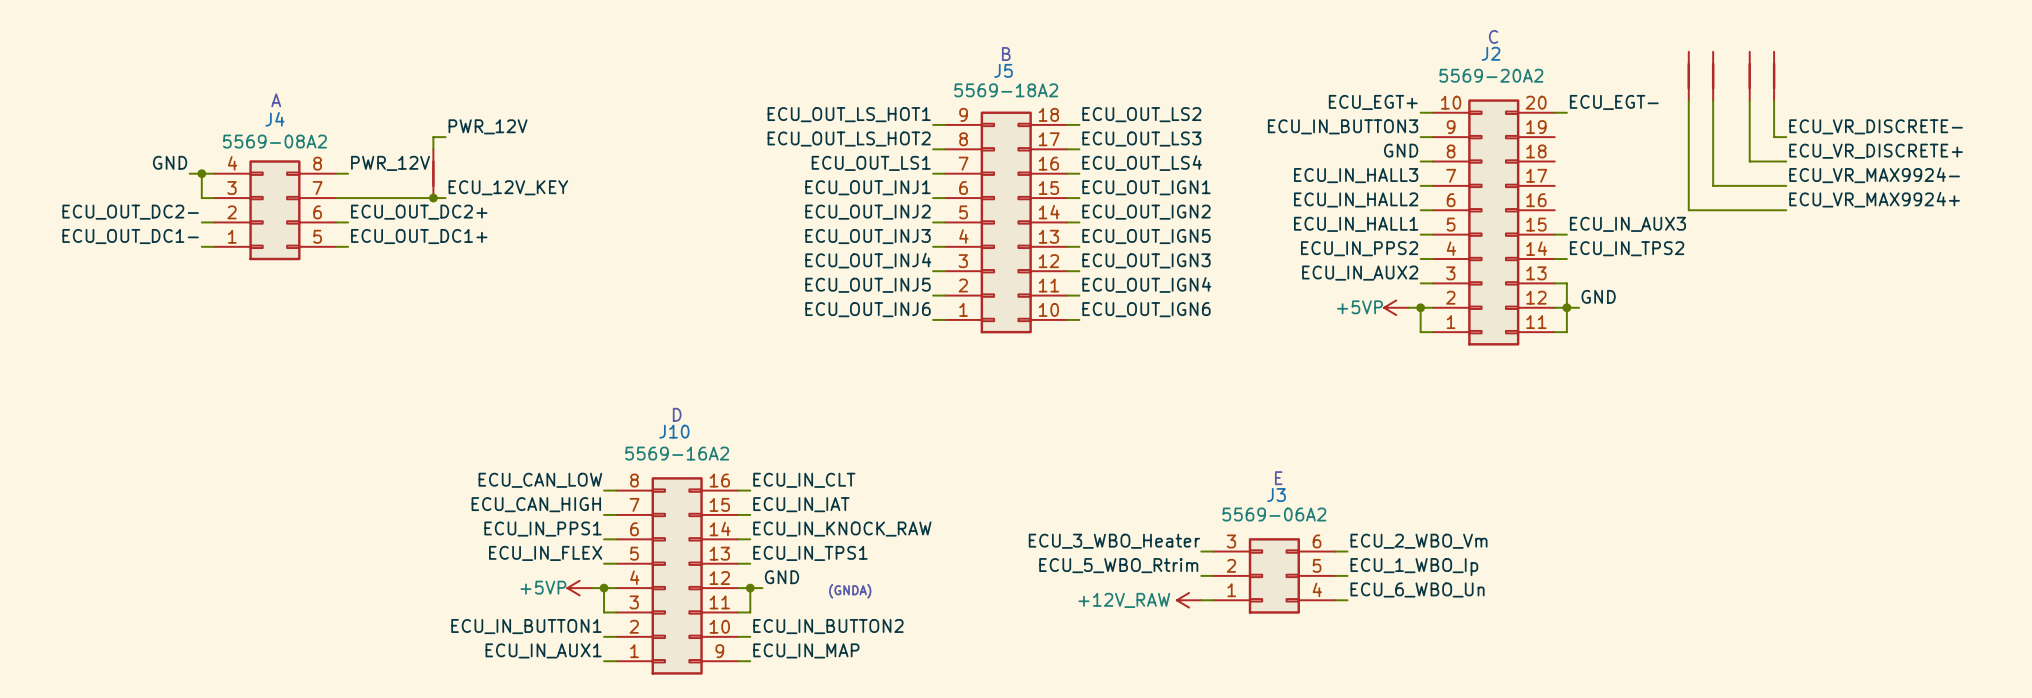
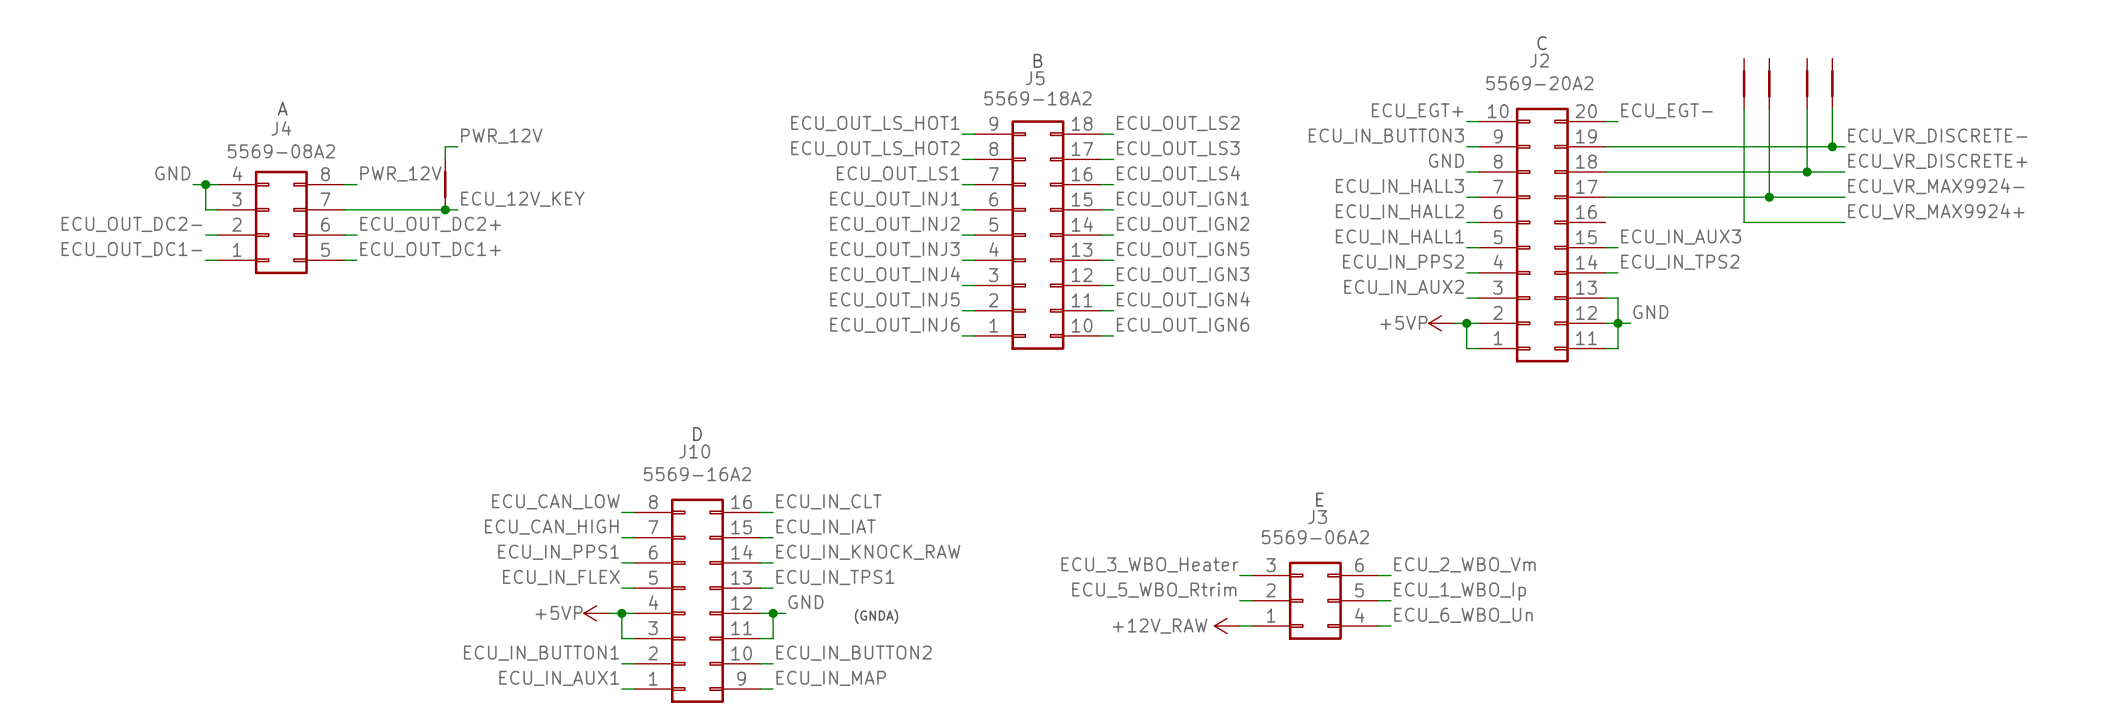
wire: none -> (1605, 146) (1832, 146)
junction: none -> (1832, 146)
wire: none -> (1605, 172) (1807, 172)
junction: none -> (1807, 172)
wire: none -> (1605, 197) (1769, 197)
junction: none -> (1769, 197)

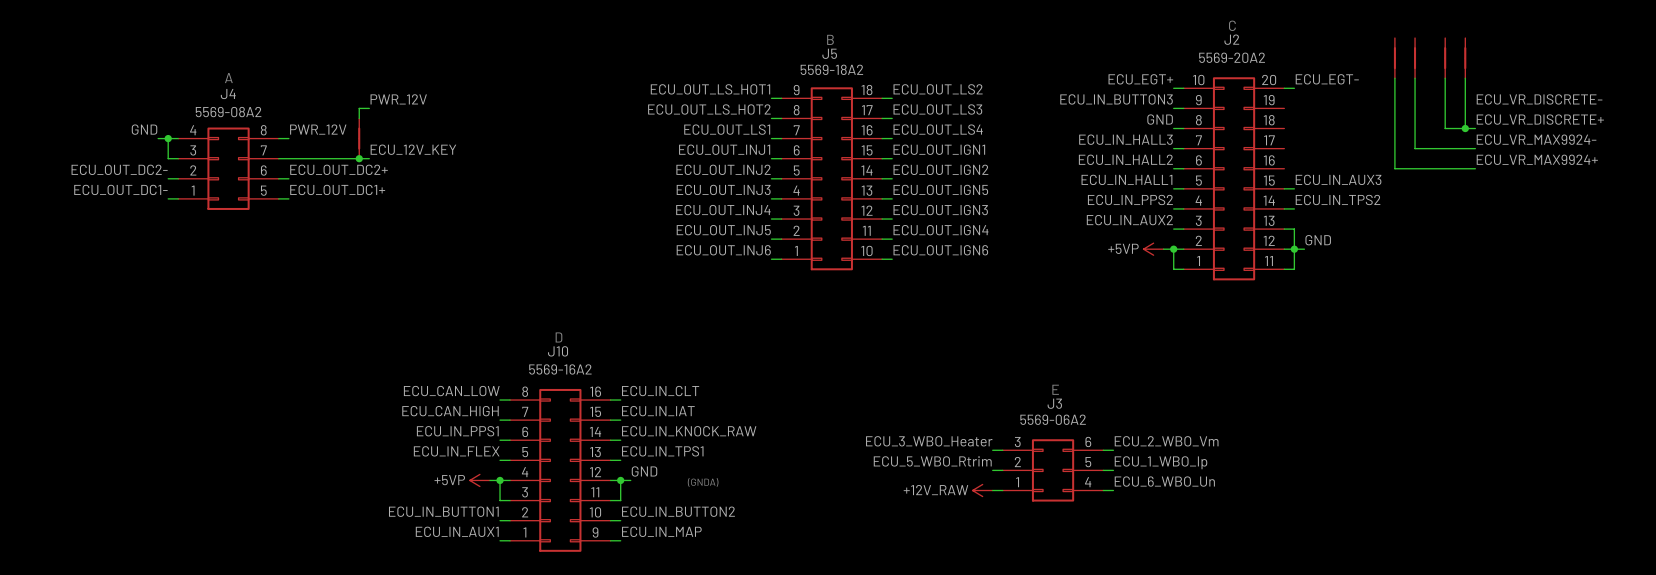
wire: (1605, 146) (1844, 146) -> none
wire: none -> (1465, 108) (1465, 128)
junction: (1832, 146) -> none
wire: (1605, 172) (1807, 172) -> none
junction: (1807, 172) -> none
junction: none -> (1465, 128)
wire: (1605, 197) (1769, 197) -> none
junction: (1769, 197) -> none

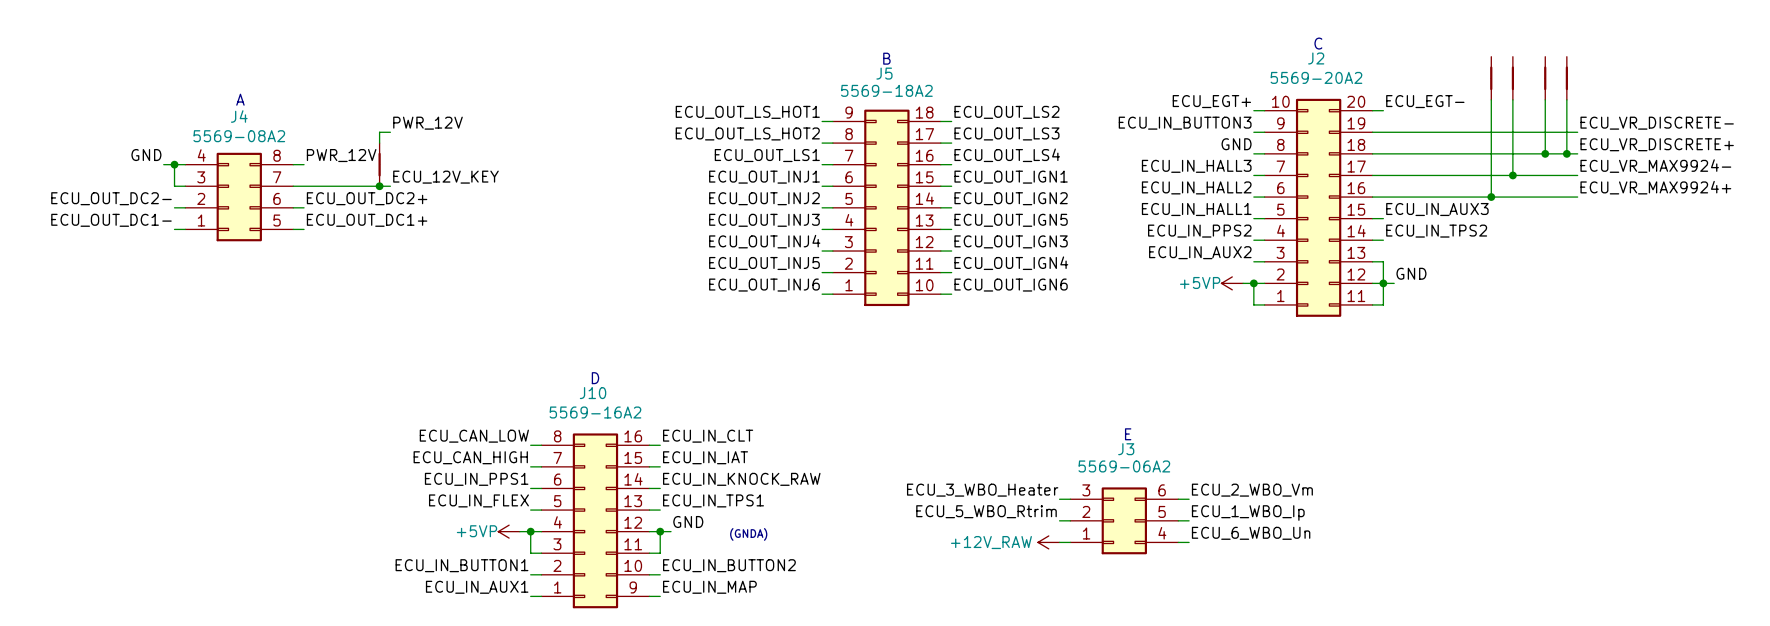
wire: none -> (1372, 132) (1577, 132)
wire: none -> (1372, 153) (1545, 153)
junction: none -> (1545, 153)
wire: none -> (1372, 175) (1512, 175)
junction: none -> (1512, 175)
wire: none -> (1372, 197) (1491, 197)
junction: none -> (1491, 197)

